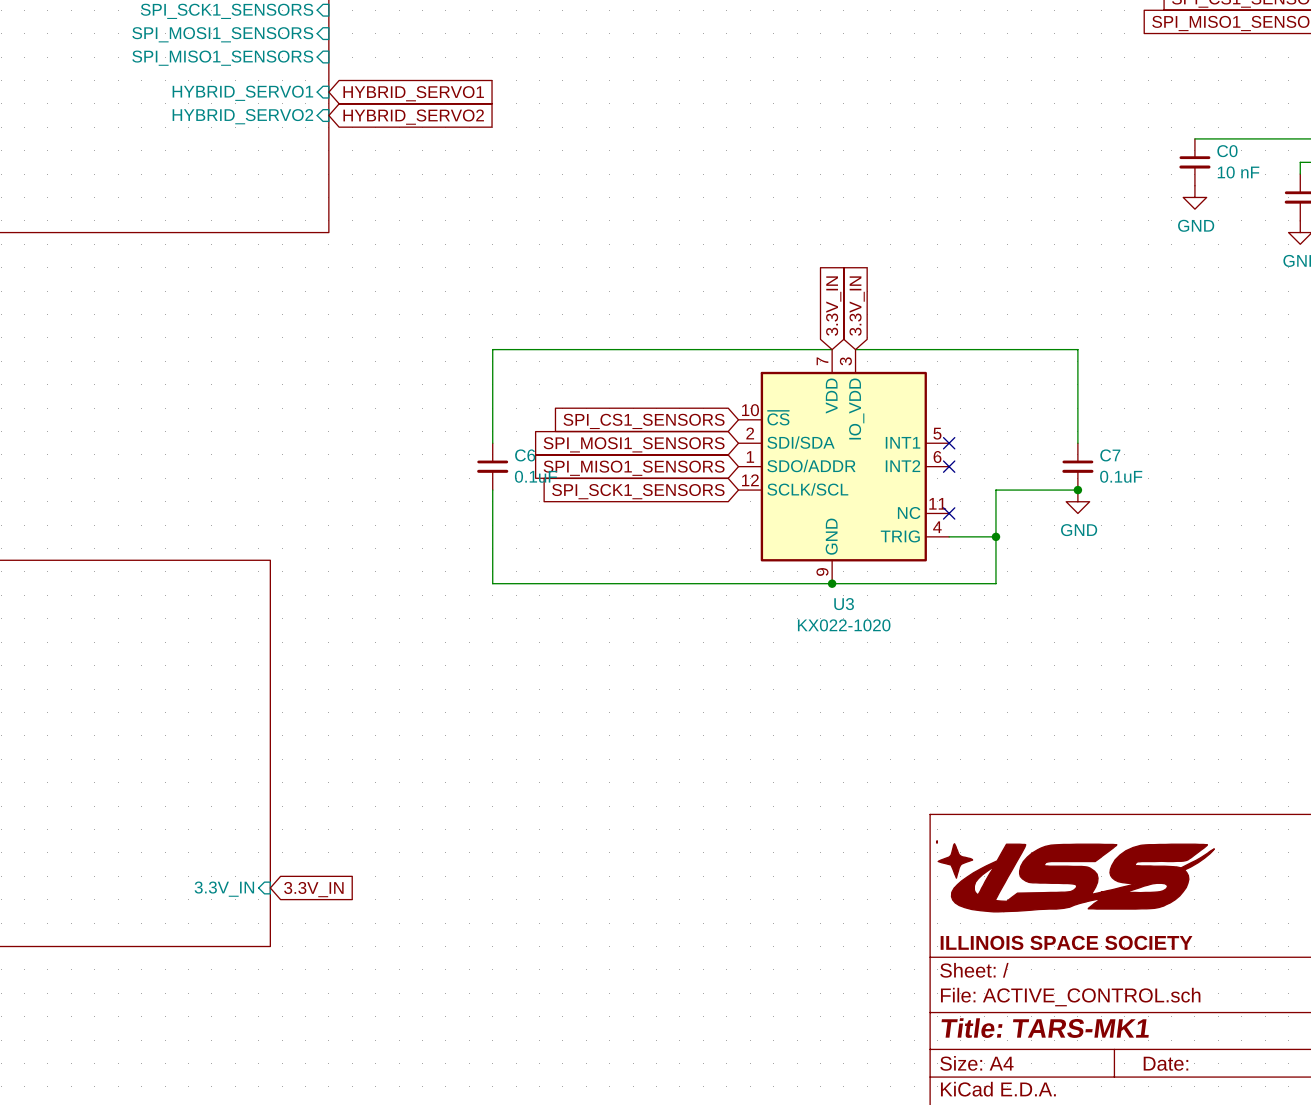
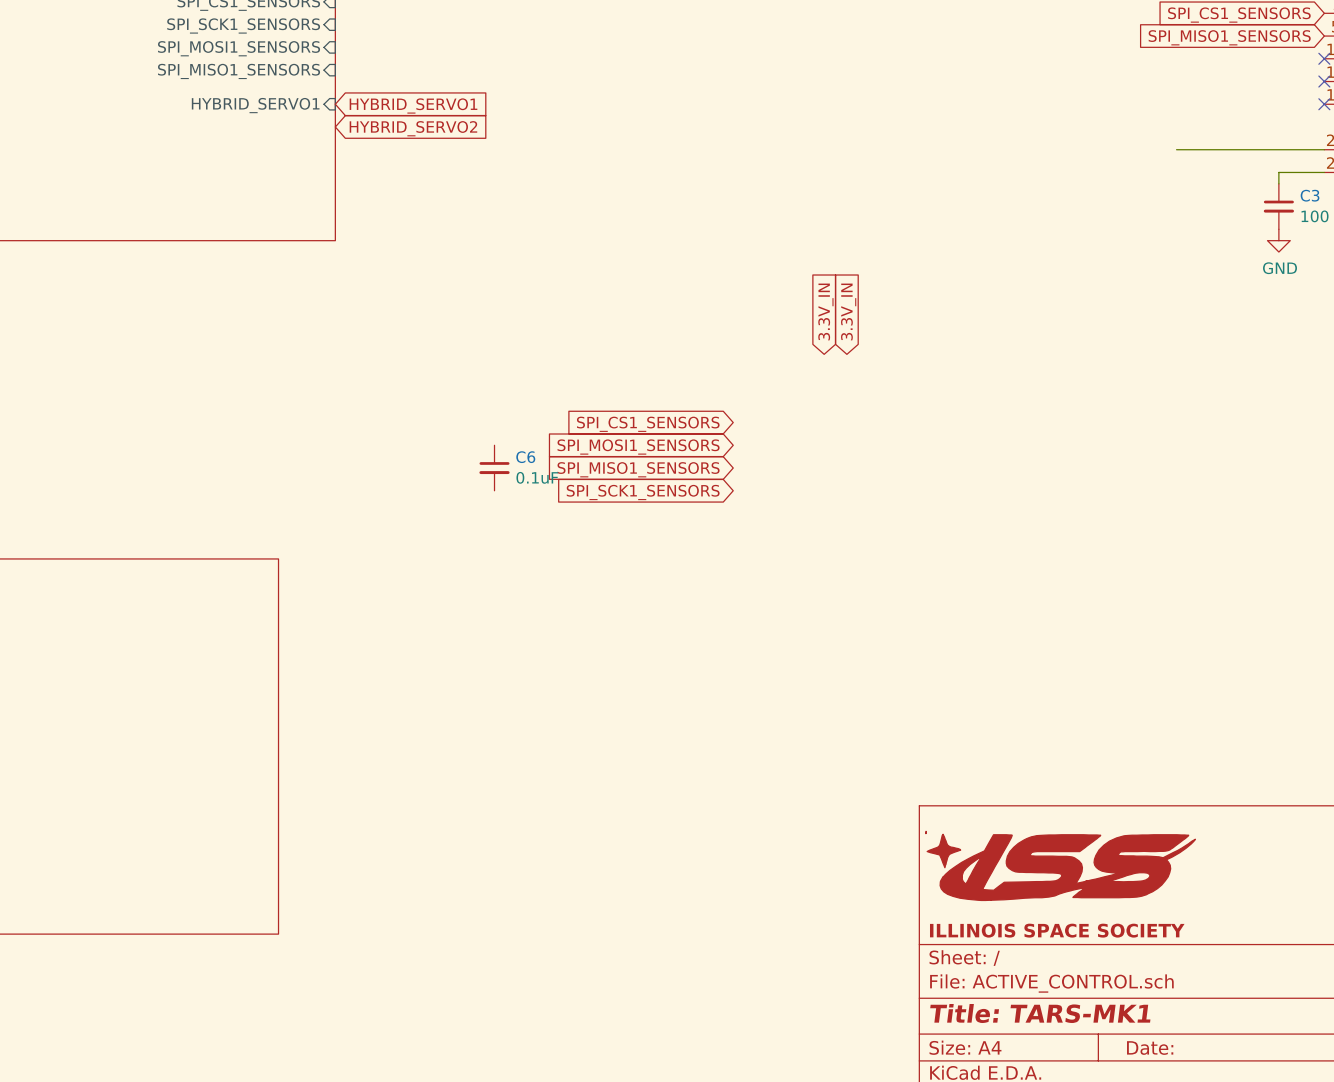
sheet pin: HYBRID_SERVO2 (242, 116) -> none
C0: 10 nF (1194, 162) -> none
power symbol: GND (1194, 197) -> none
wire: (832, 349) (492, 349) (492, 443) -> none
wire: (855, 349) (1077, 349) (1077, 443) -> none
no-connect mark: (949, 443) -> none
U3: KX022-1020 (843, 466) -> none
no-connect mark: (949, 466) -> none
C7: 0.1uF (1077, 466) -> none
wire: (492, 490) (492, 583) (995, 583) (995, 490) (1077, 490) -> none
junction: (1077, 490) -> none
power symbol: GND (1077, 501) -> none
no-connect mark: (949, 513) -> none
wire: (949, 536) (995, 536) -> none
junction: (995, 536) -> none
junction: (832, 583) -> none
sheet pin: 3.3V_IN (224, 889) -> none
global label: 3.3V_IN (313, 889) -> none

